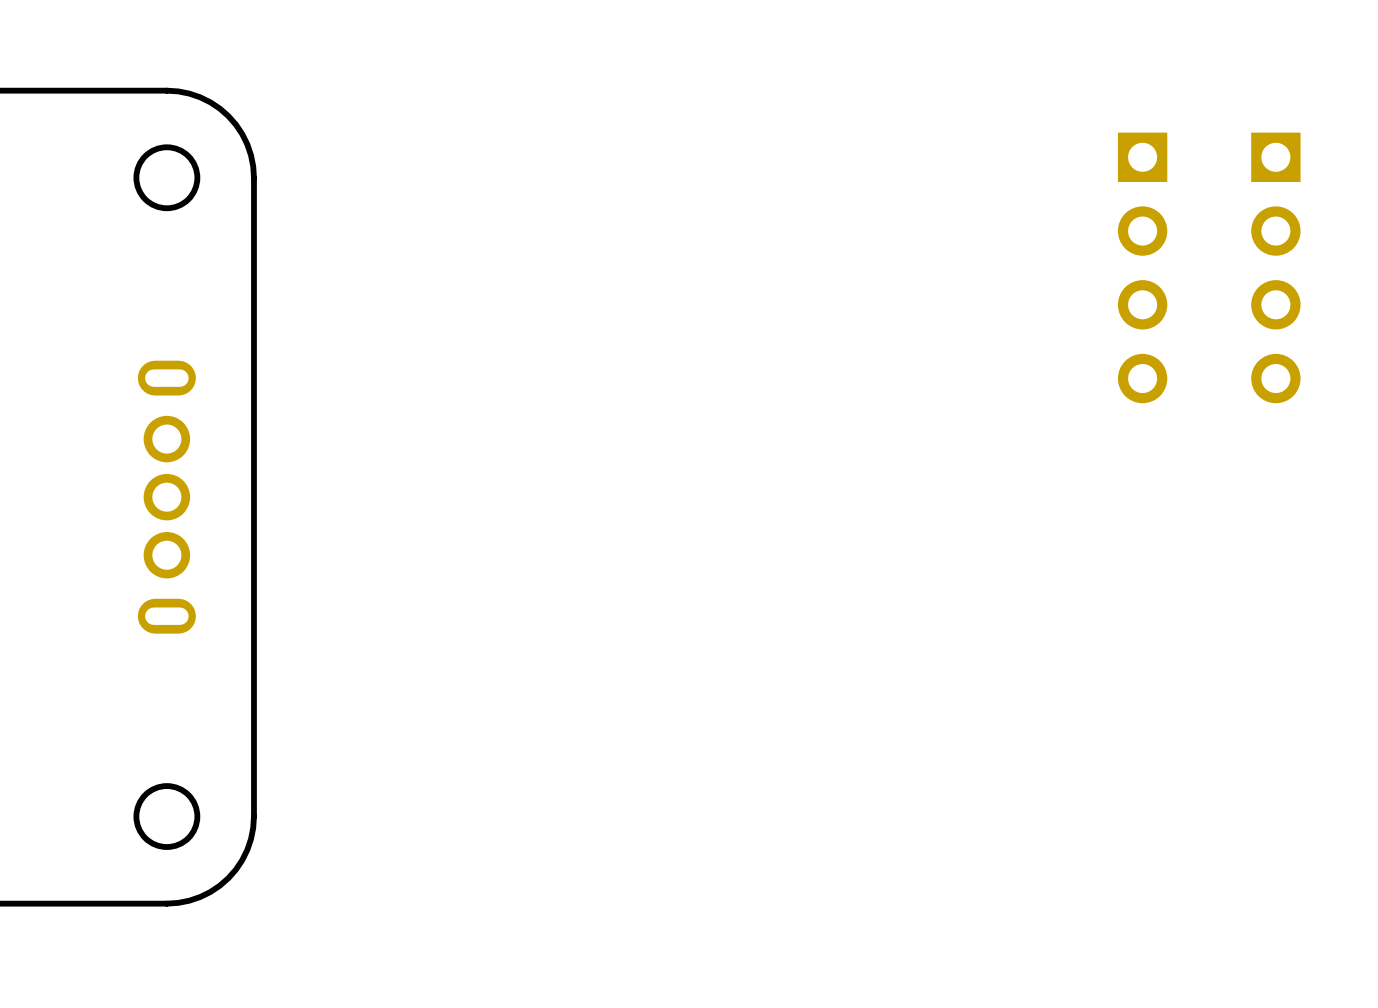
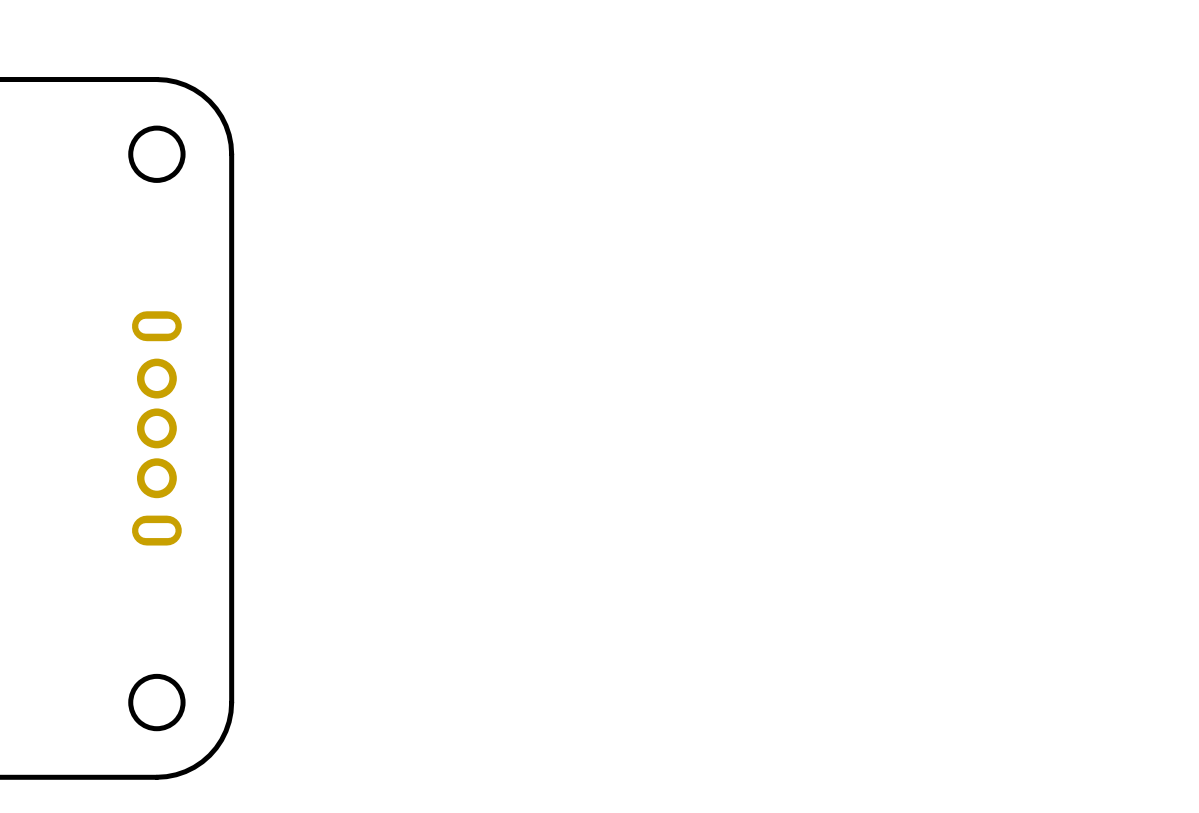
part: (1142, 267) -> none
part: (1275, 267) -> none

